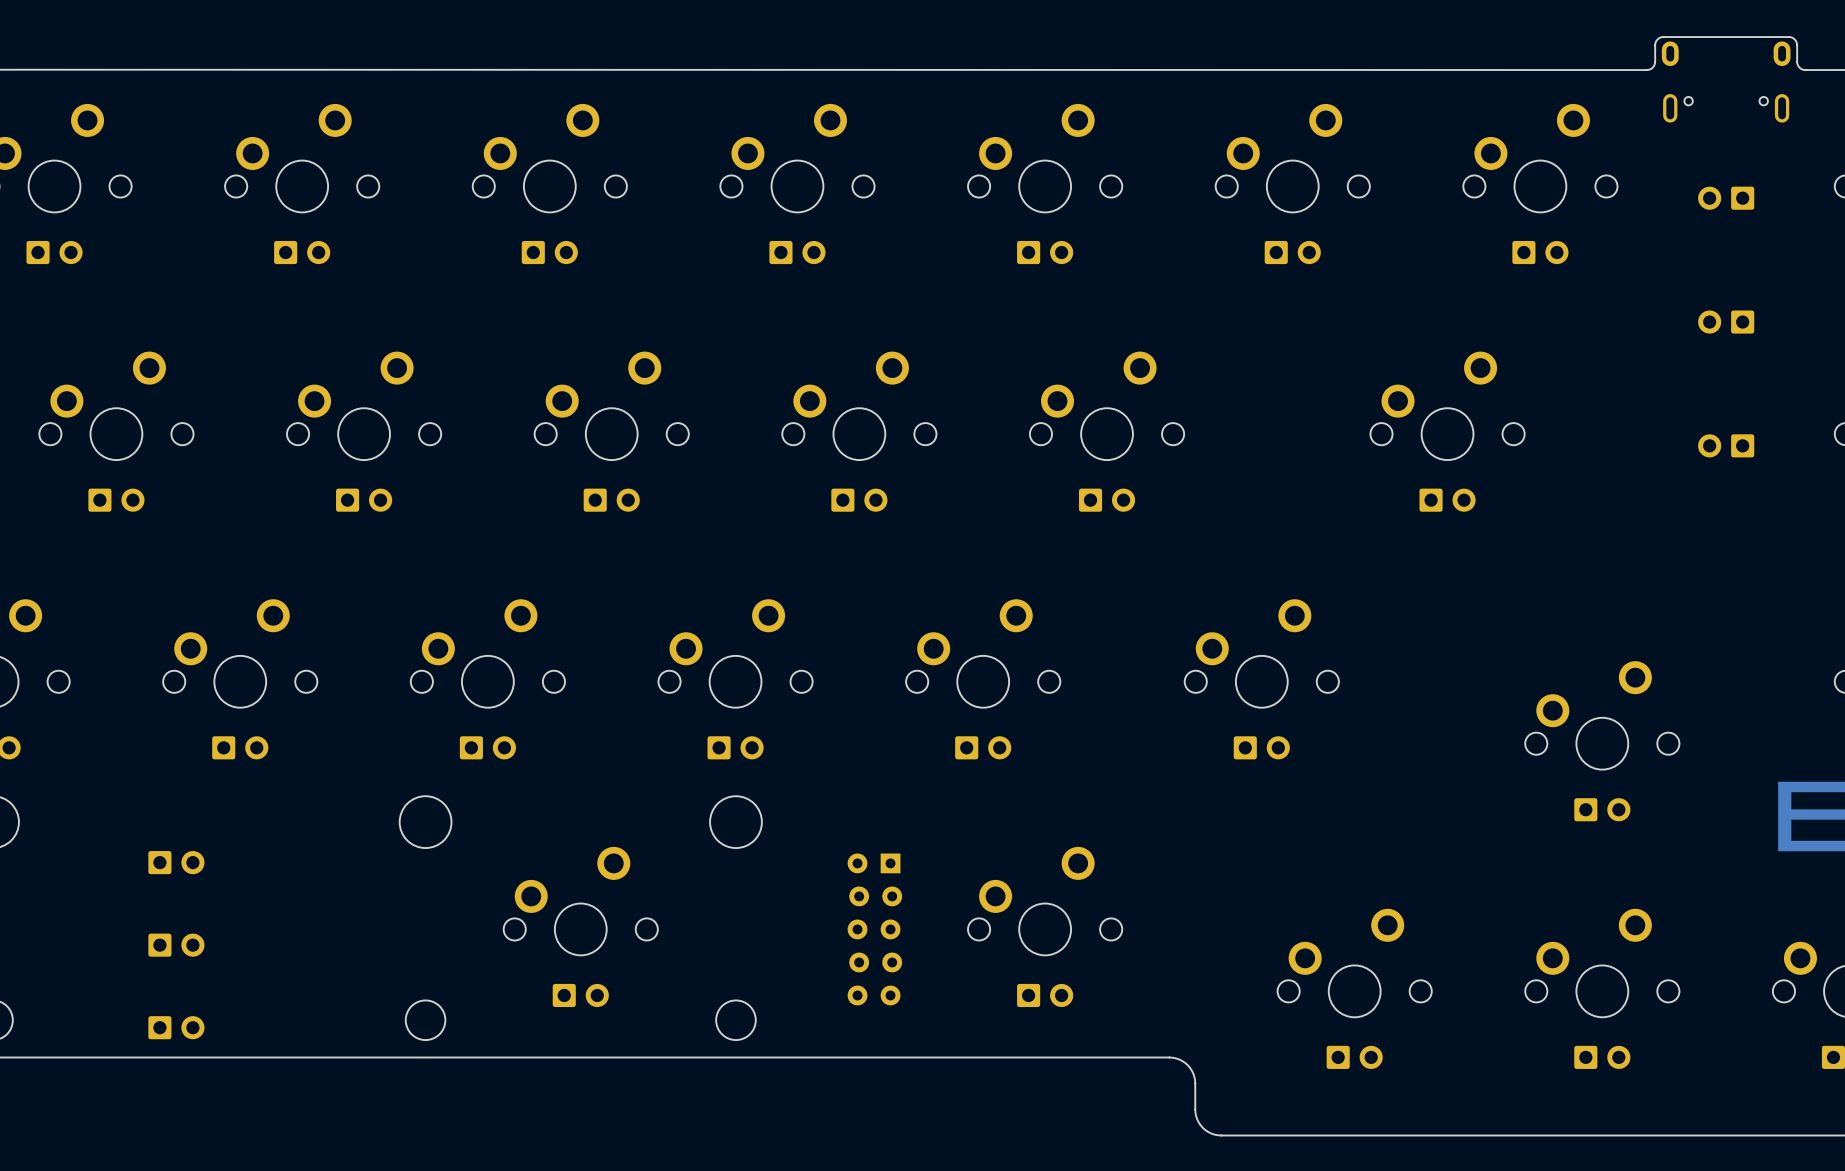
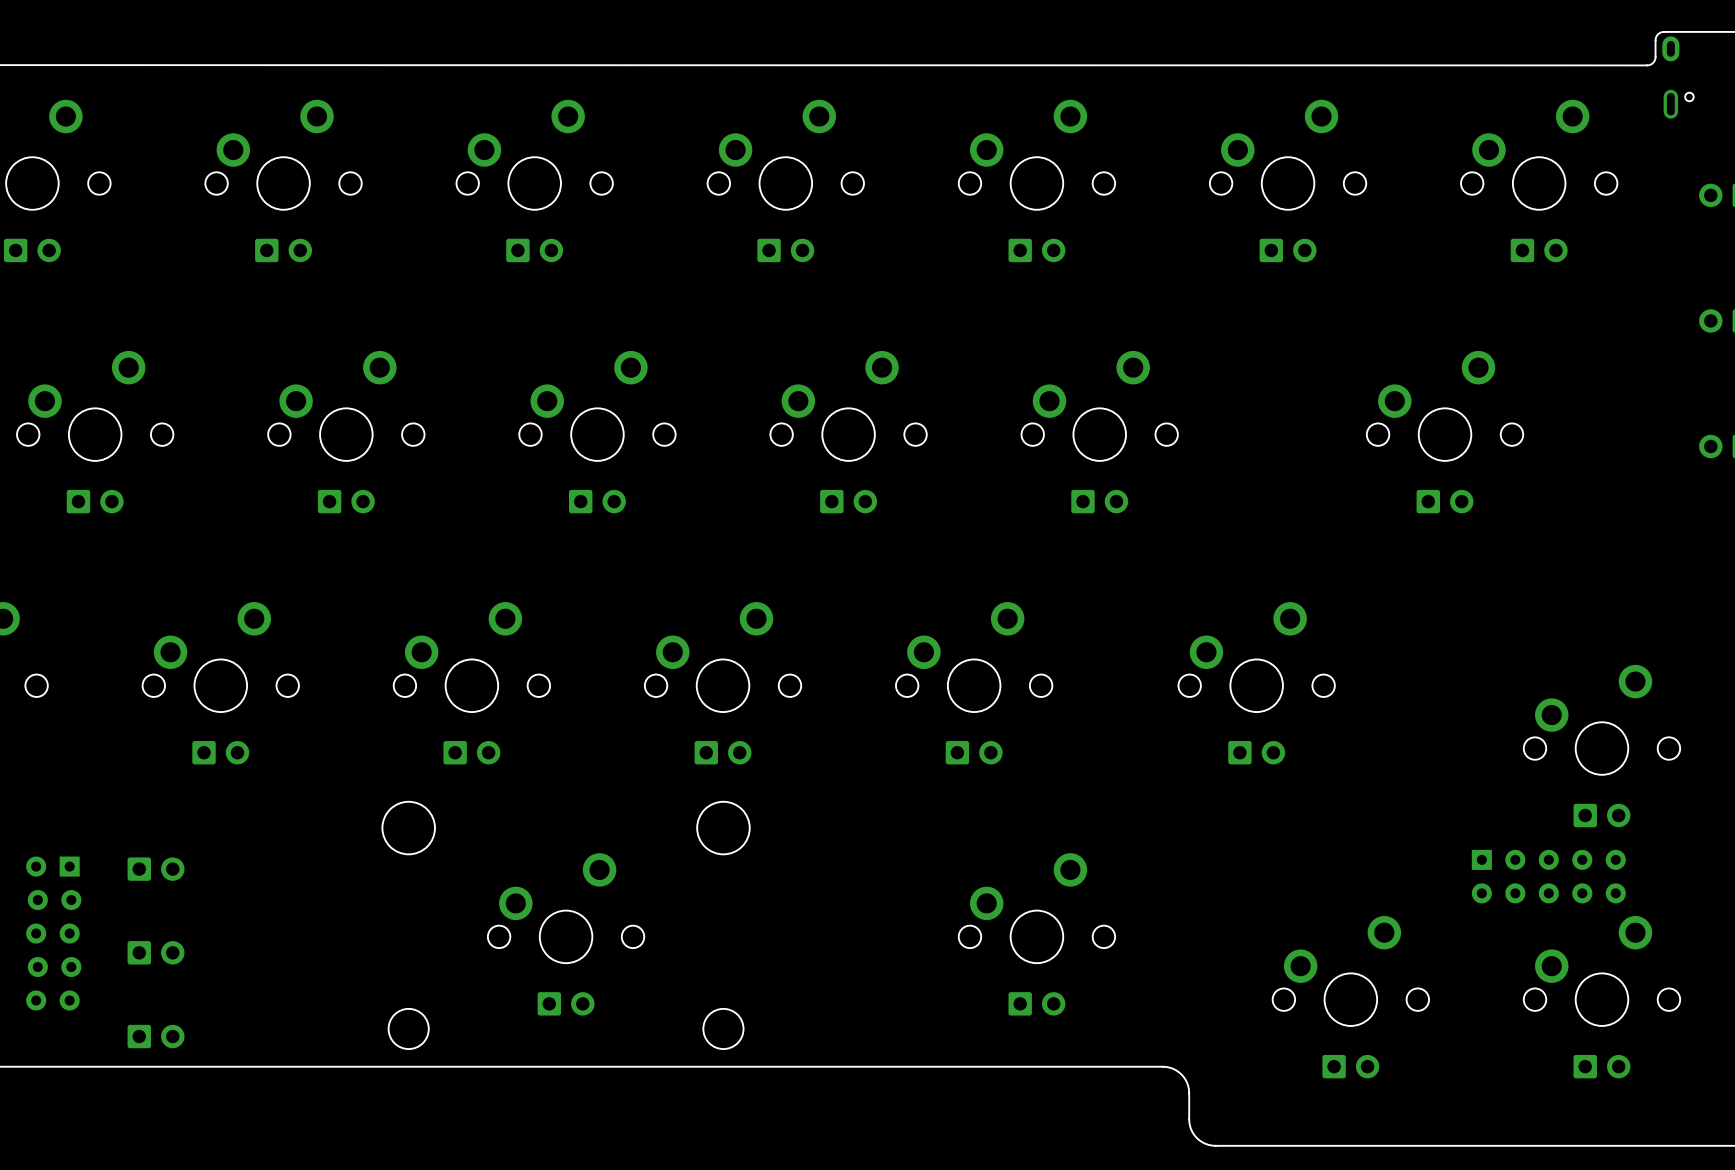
part: none -> (1548, 876)
part: none -> (53, 933)
part: (874, 929) -> none

